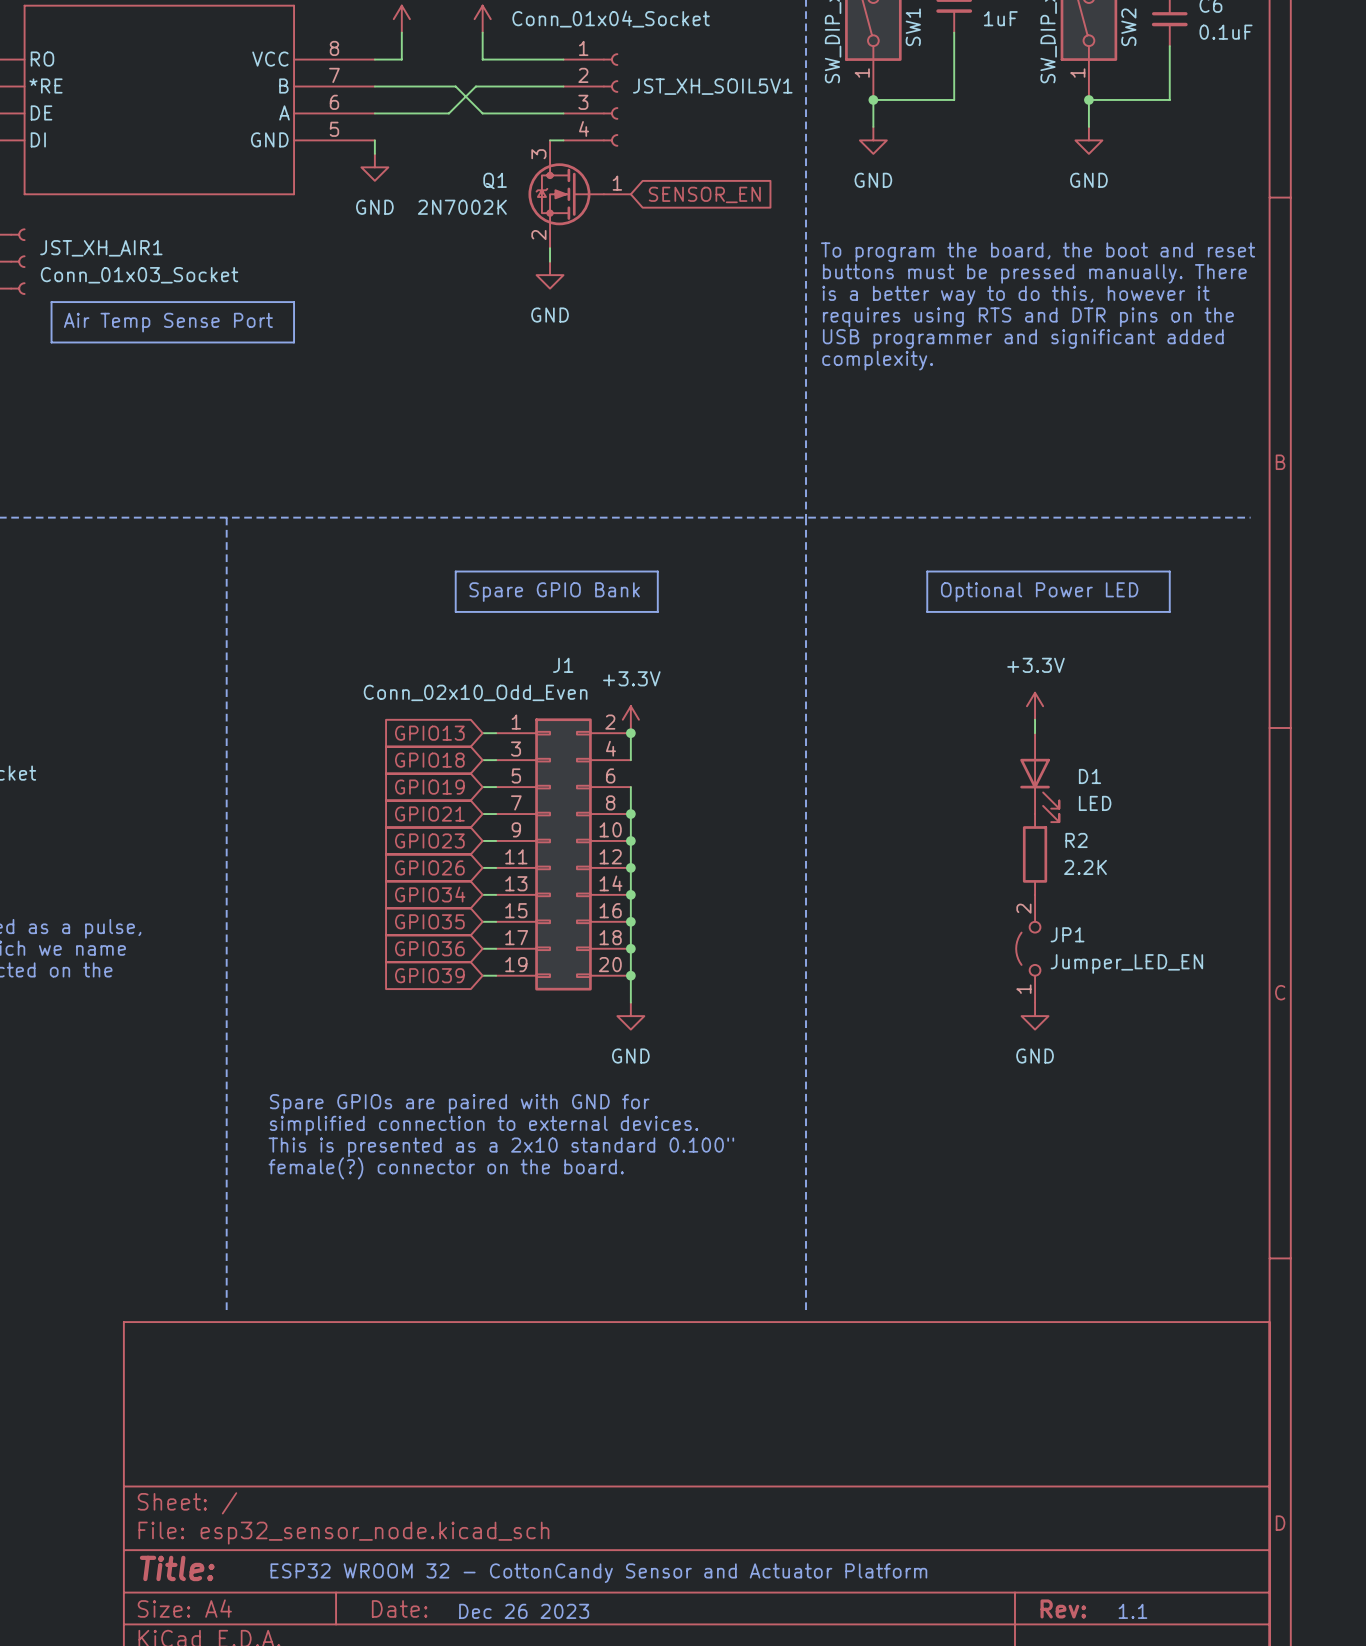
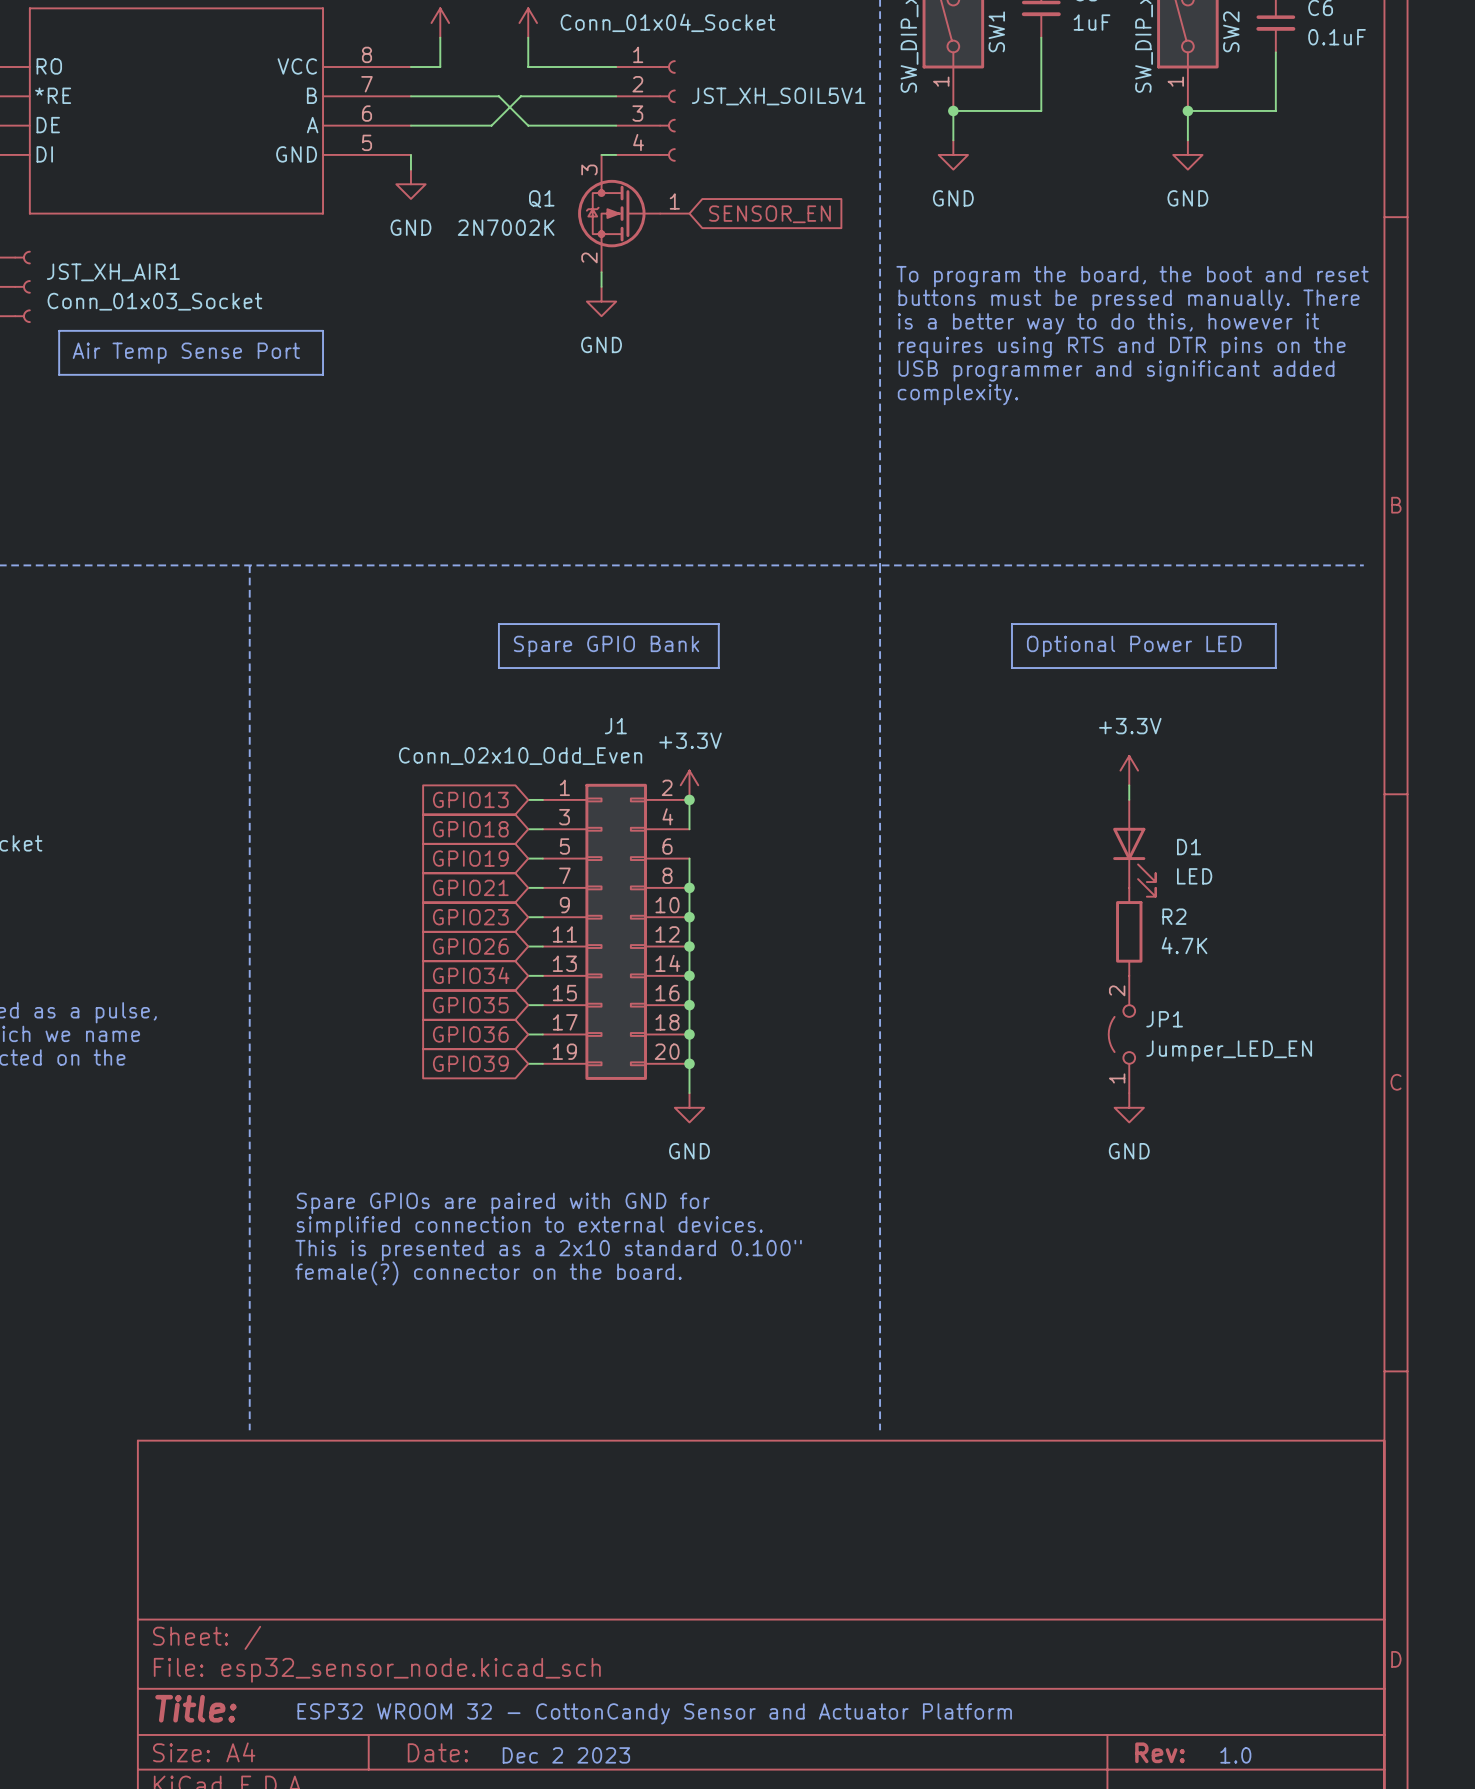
R2 value: 2.2K (1085, 867) -> 4.7K (1184, 945)
text: Dec 26 2023 (524, 1611) -> Dec 2 2023 (566, 1755)
text: 1.1 (1132, 1611) -> 1.0 (1235, 1755)

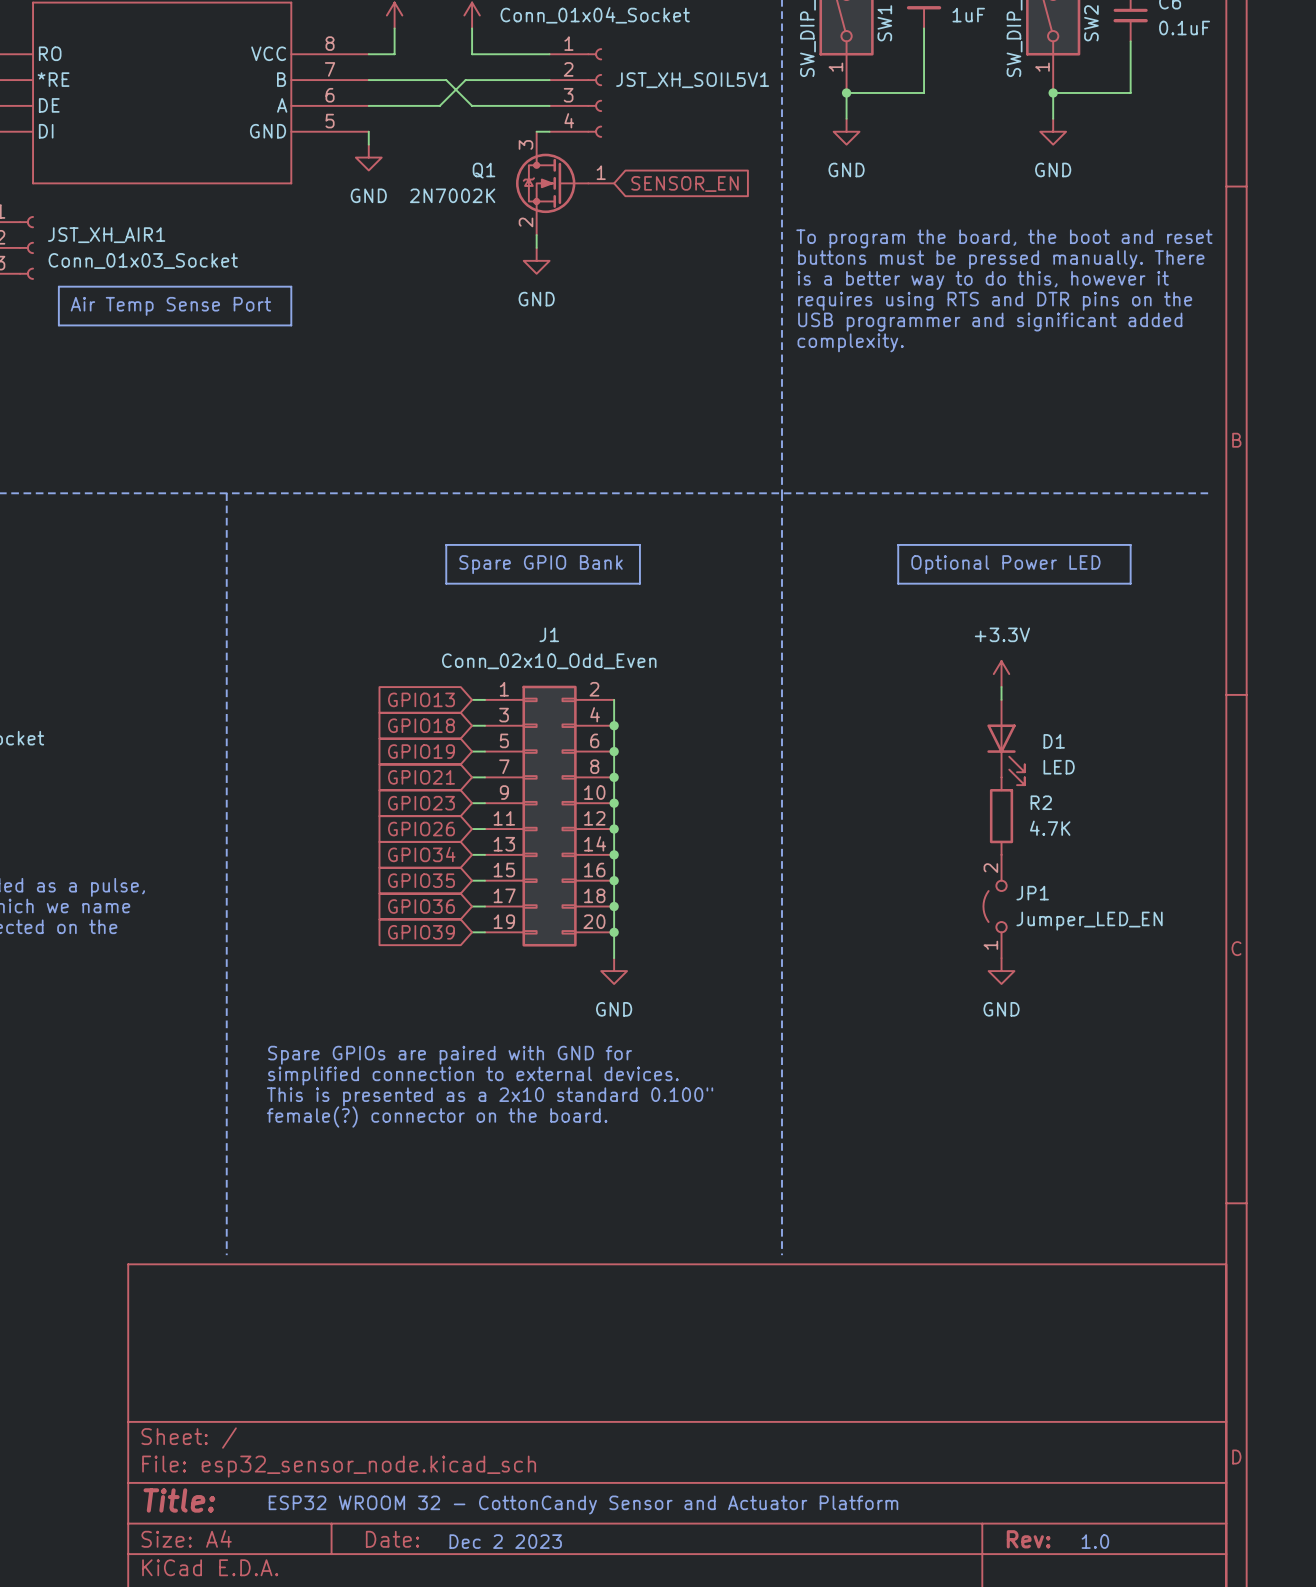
J1 value position: Conn_02x10_Odd_Even (520, 756) -> Conn_02x10_Odd_Even (549, 661)
power symbol: +3.3V (689, 785) -> none
junction: (689, 799) -> none
wire: none -> (614, 725) (614, 751)
junction: none -> (614, 725)
junction: none -> (614, 751)

